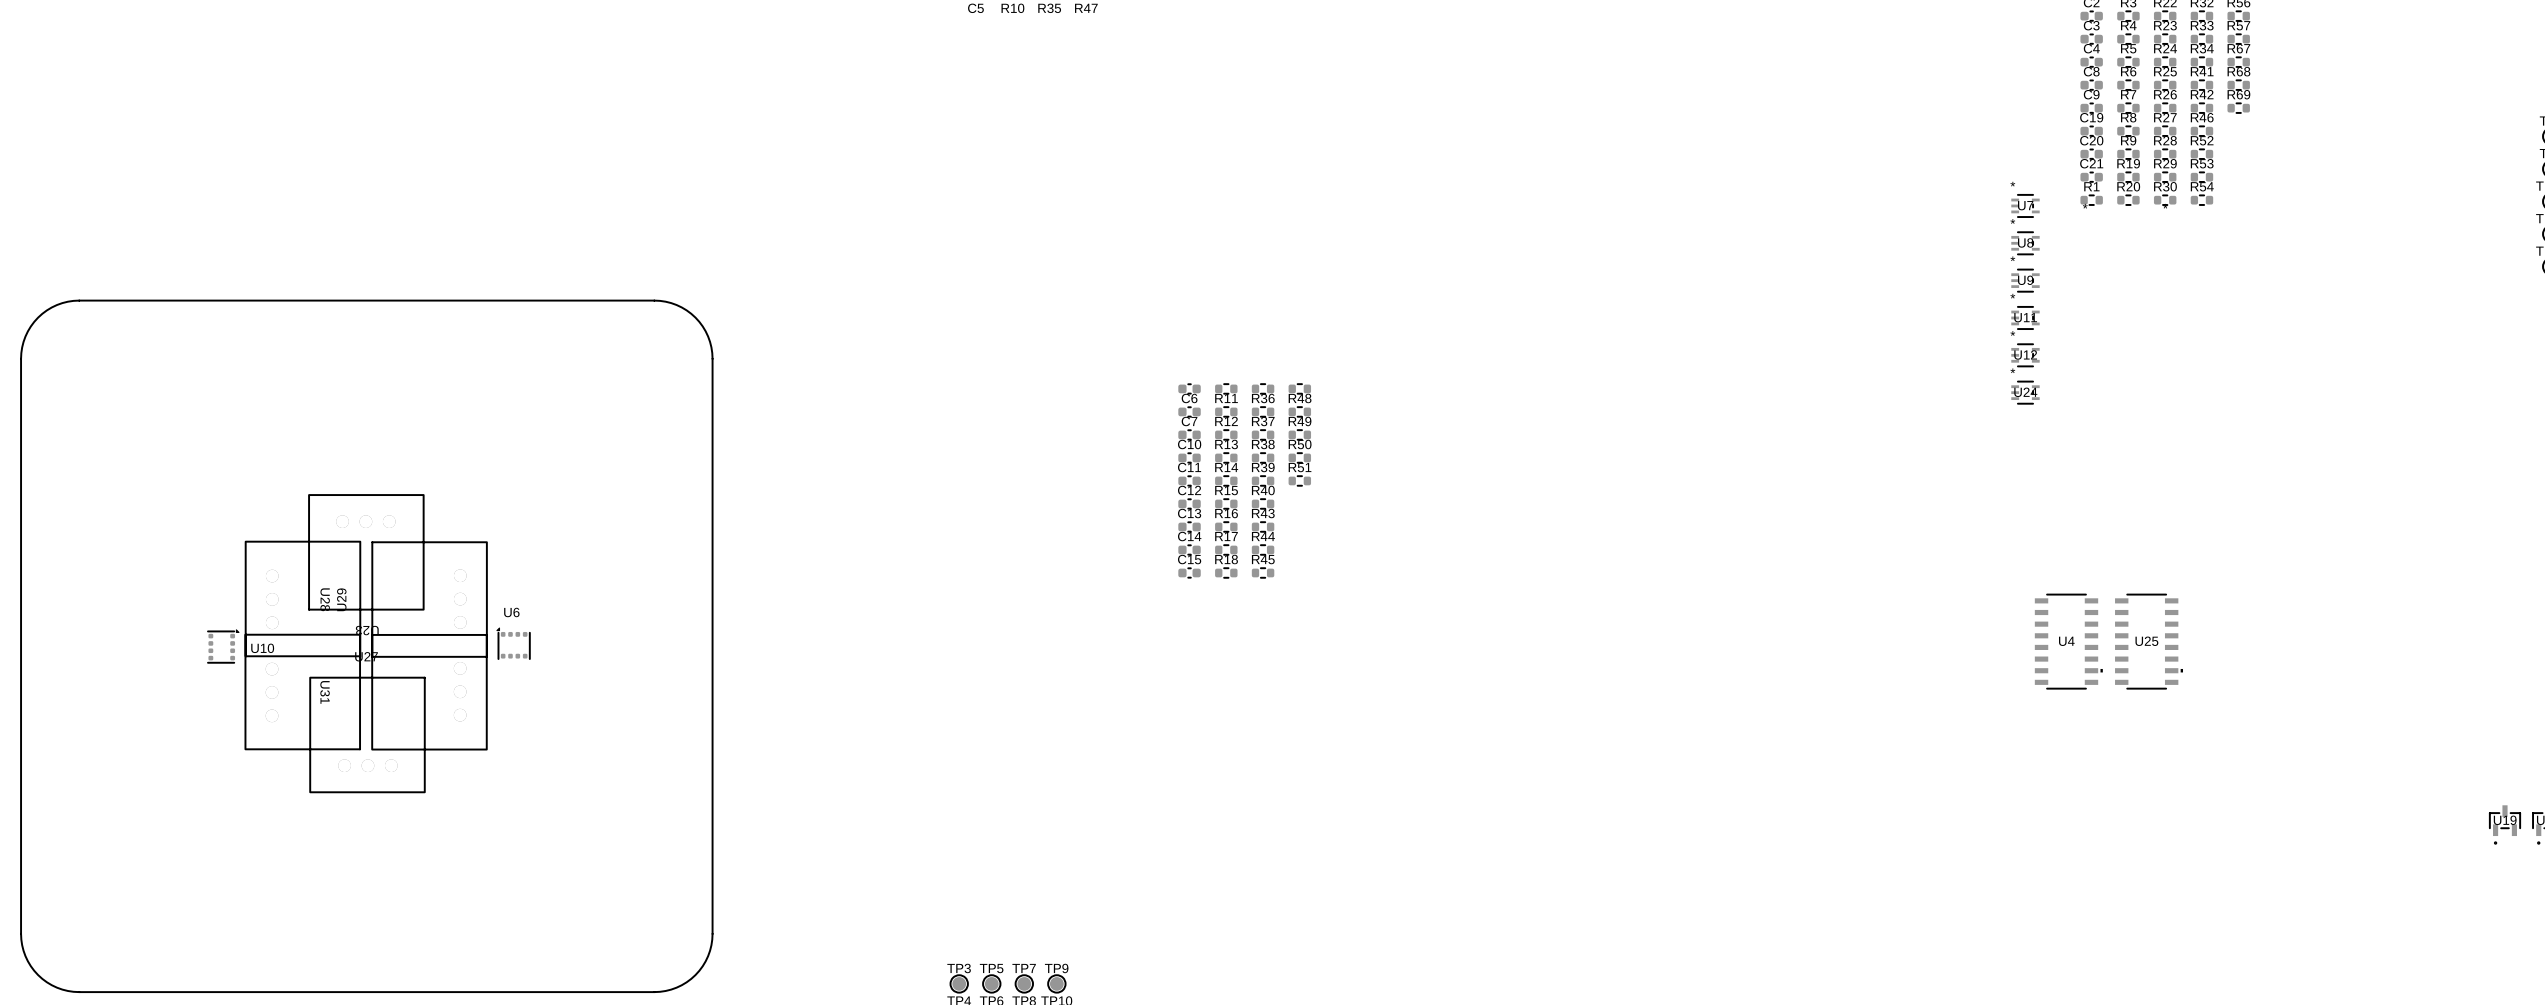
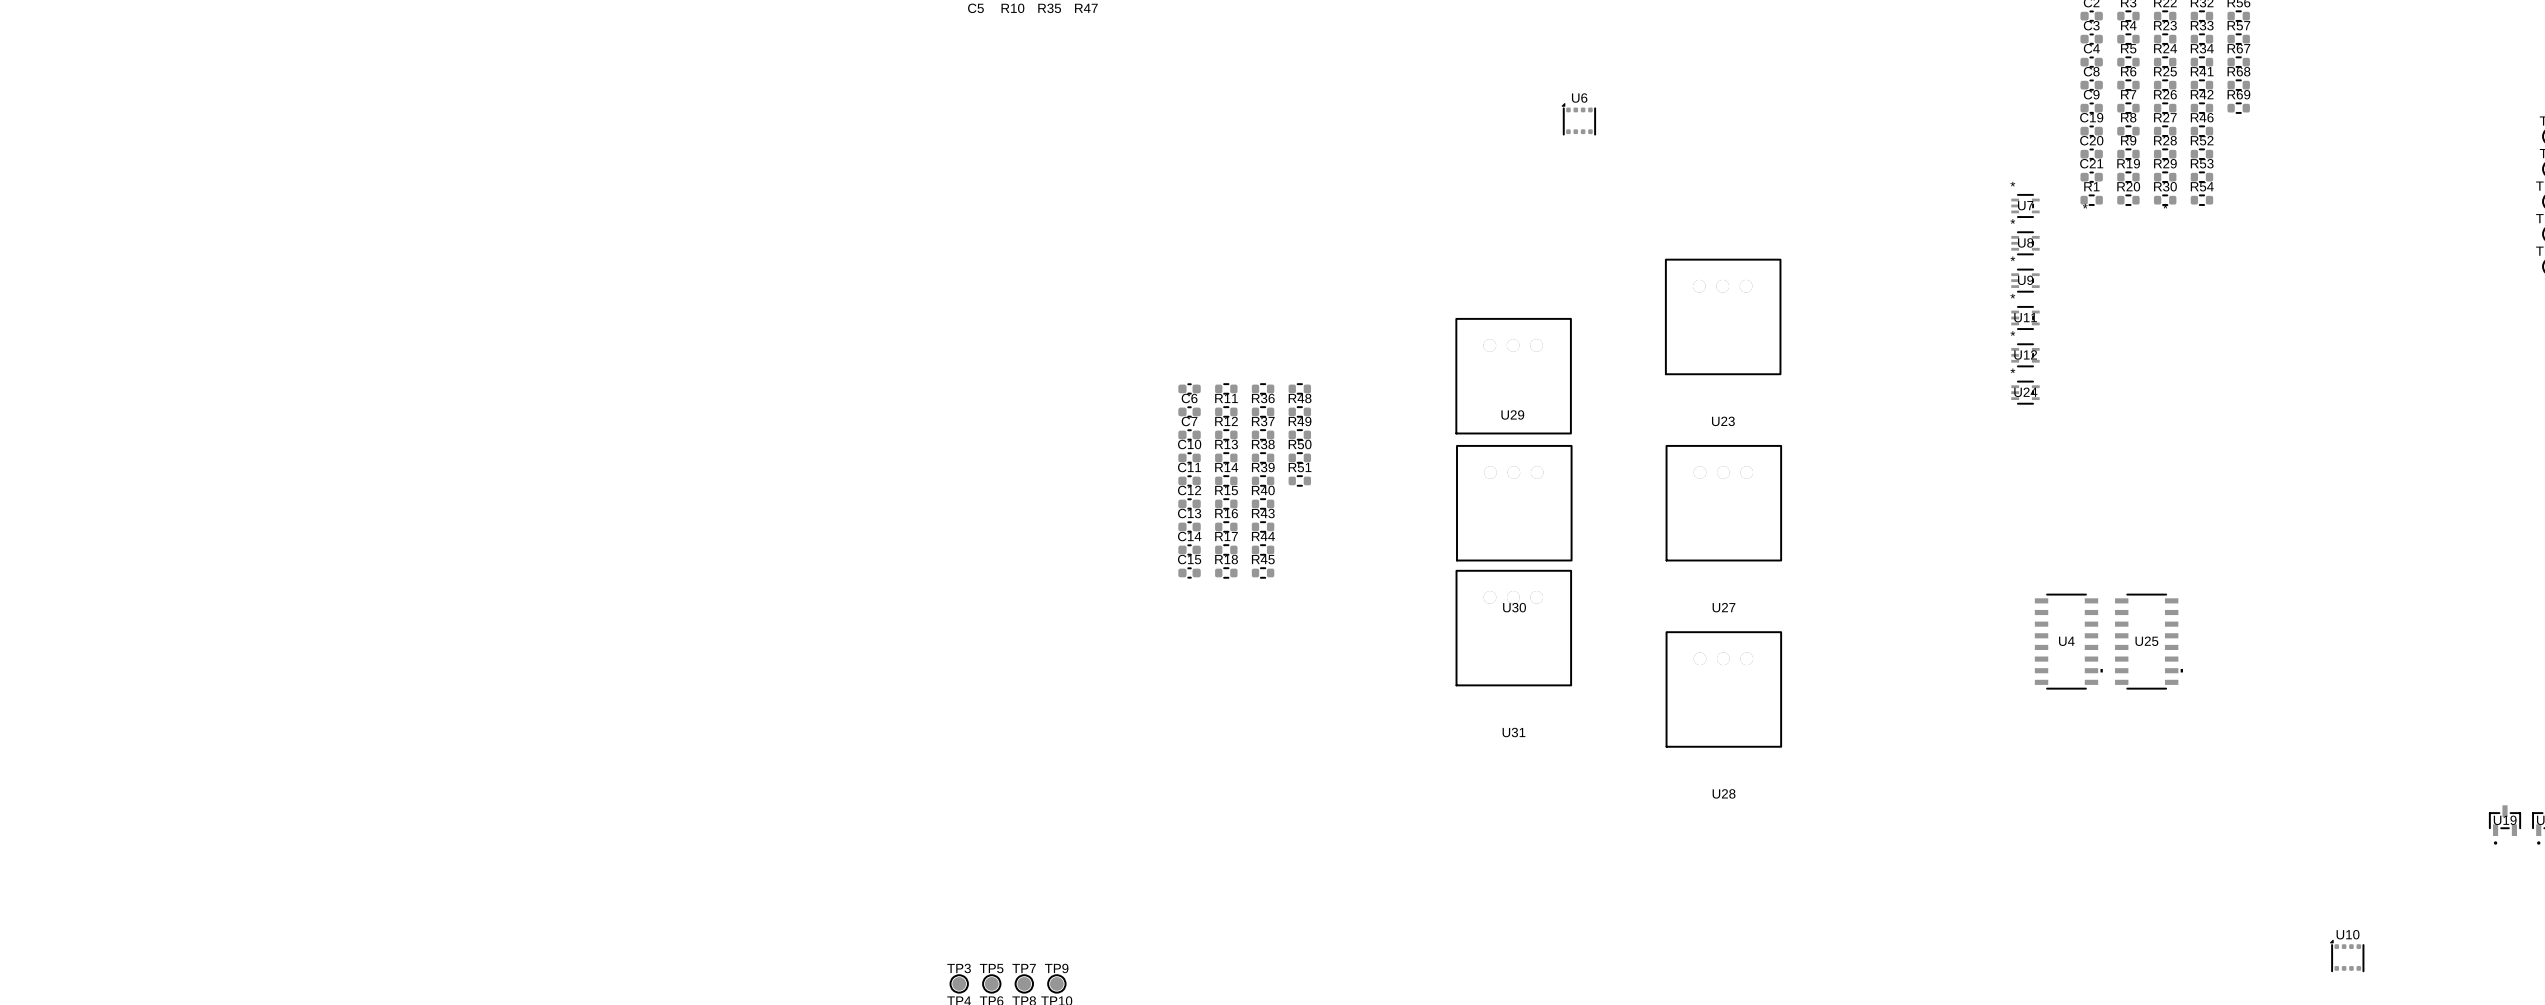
board edge: (79, 300) (654, 300) (676, 305) (695, 317) (708, 336) (712, 358) (712, 933) (708, 956) (695, 975) (676, 987) (654, 992) (79, 992) (56, 987) (38, 975) (25, 956) (21, 933) (21, 353) (27, 331) (42, 313) (62, 303) (79, 300) -> none
U30: none -> (1514, 503)
U27 position: (366, 552) -> (1723, 503)
U29 rotation: 0° (302, 598) -> 90° clockwise (1513, 376)
U29 position: (302, 598) -> (1513, 376)
U28 rotation: 0° (429, 599) -> 90° counterclockwise (1723, 689)
U28 position: (429, 599) -> (1723, 689)
U6 name position: U6 (511, 612) -> U6 (1579, 98)
U6 position: (513, 643) -> (1578, 119)
U10 rotation: 0° (223, 646) -> 90° counterclockwise (2347, 955)
U10 position: (223, 646) -> (2347, 955)
U10 name position: U10 (262, 648) -> U10 (2348, 934)
part: (302, 692) -> none
U31 rotation: 0° (429, 692) -> 90° counterclockwise (1513, 628)
U31 position: (429, 692) -> (1513, 628)
U23 rotation: 0° (367, 734) -> 180° (1723, 316)
U23 position: (367, 734) -> (1723, 316)

